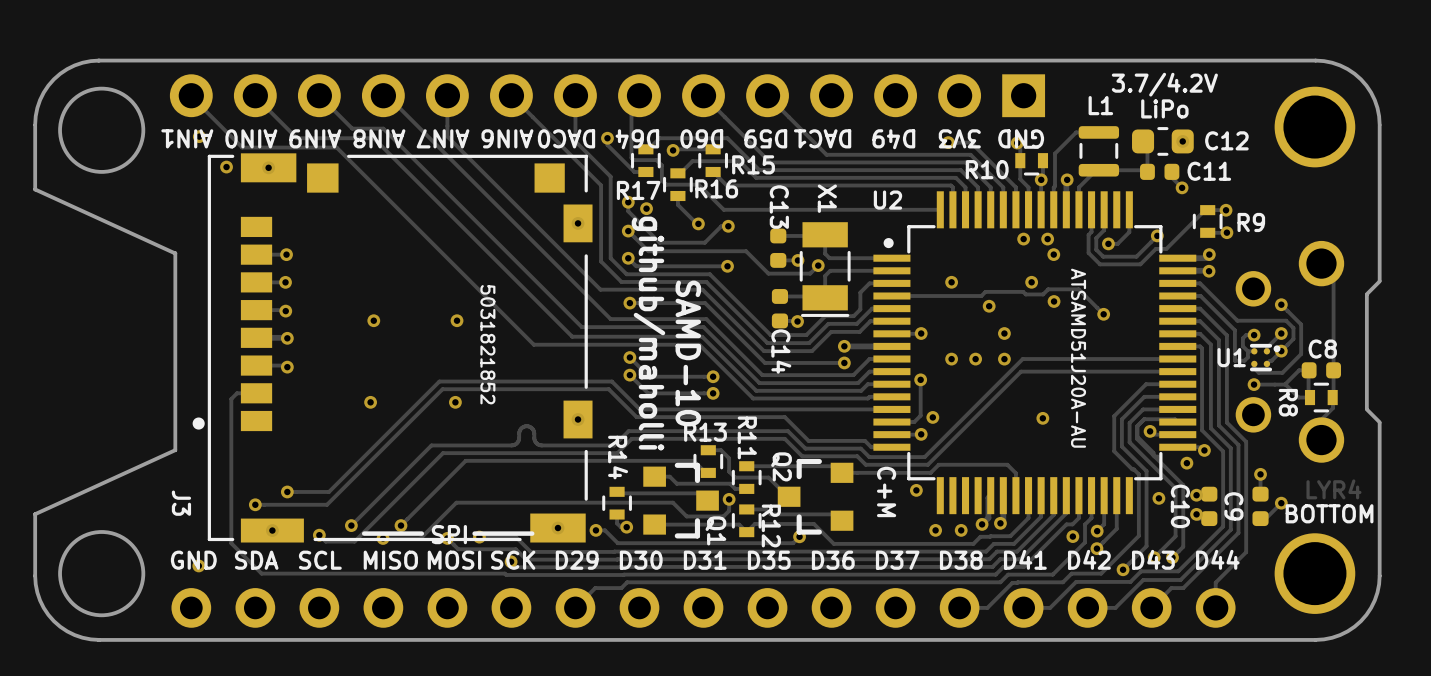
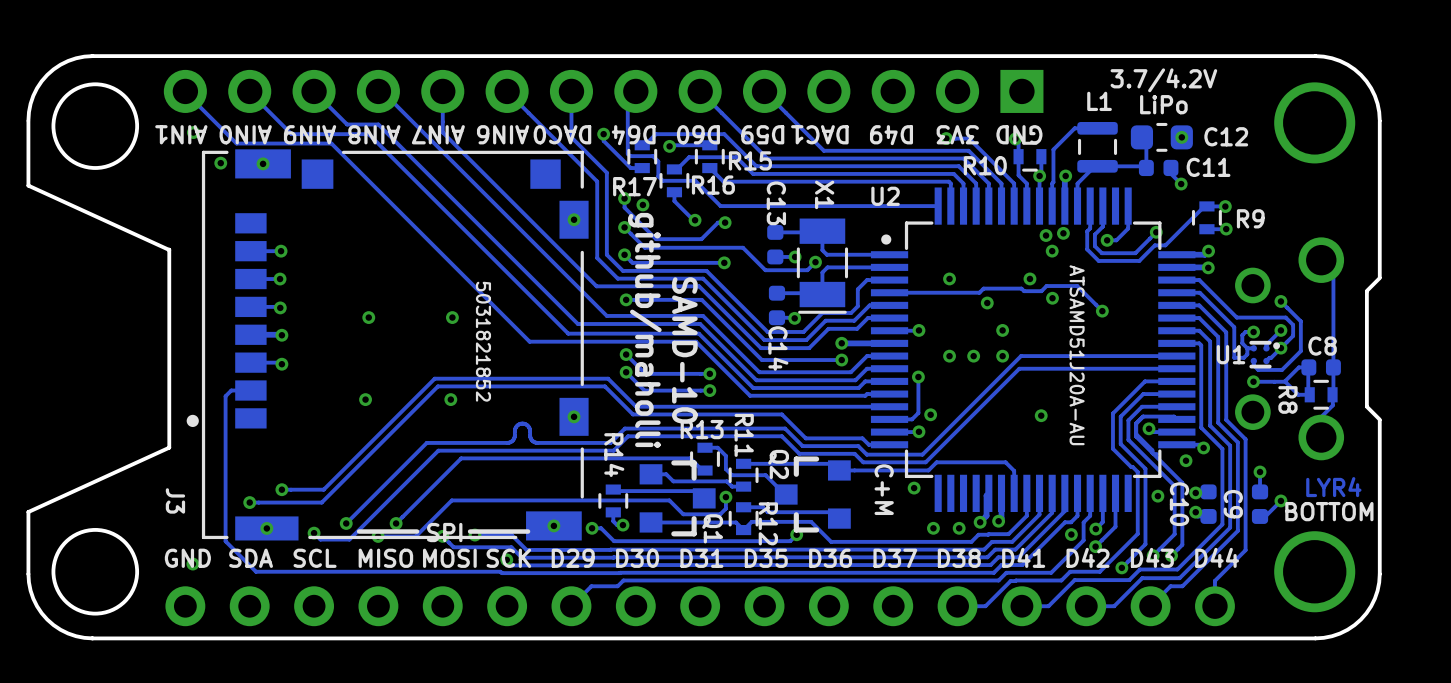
via position: (1023, 239) -> (1063, 233)

